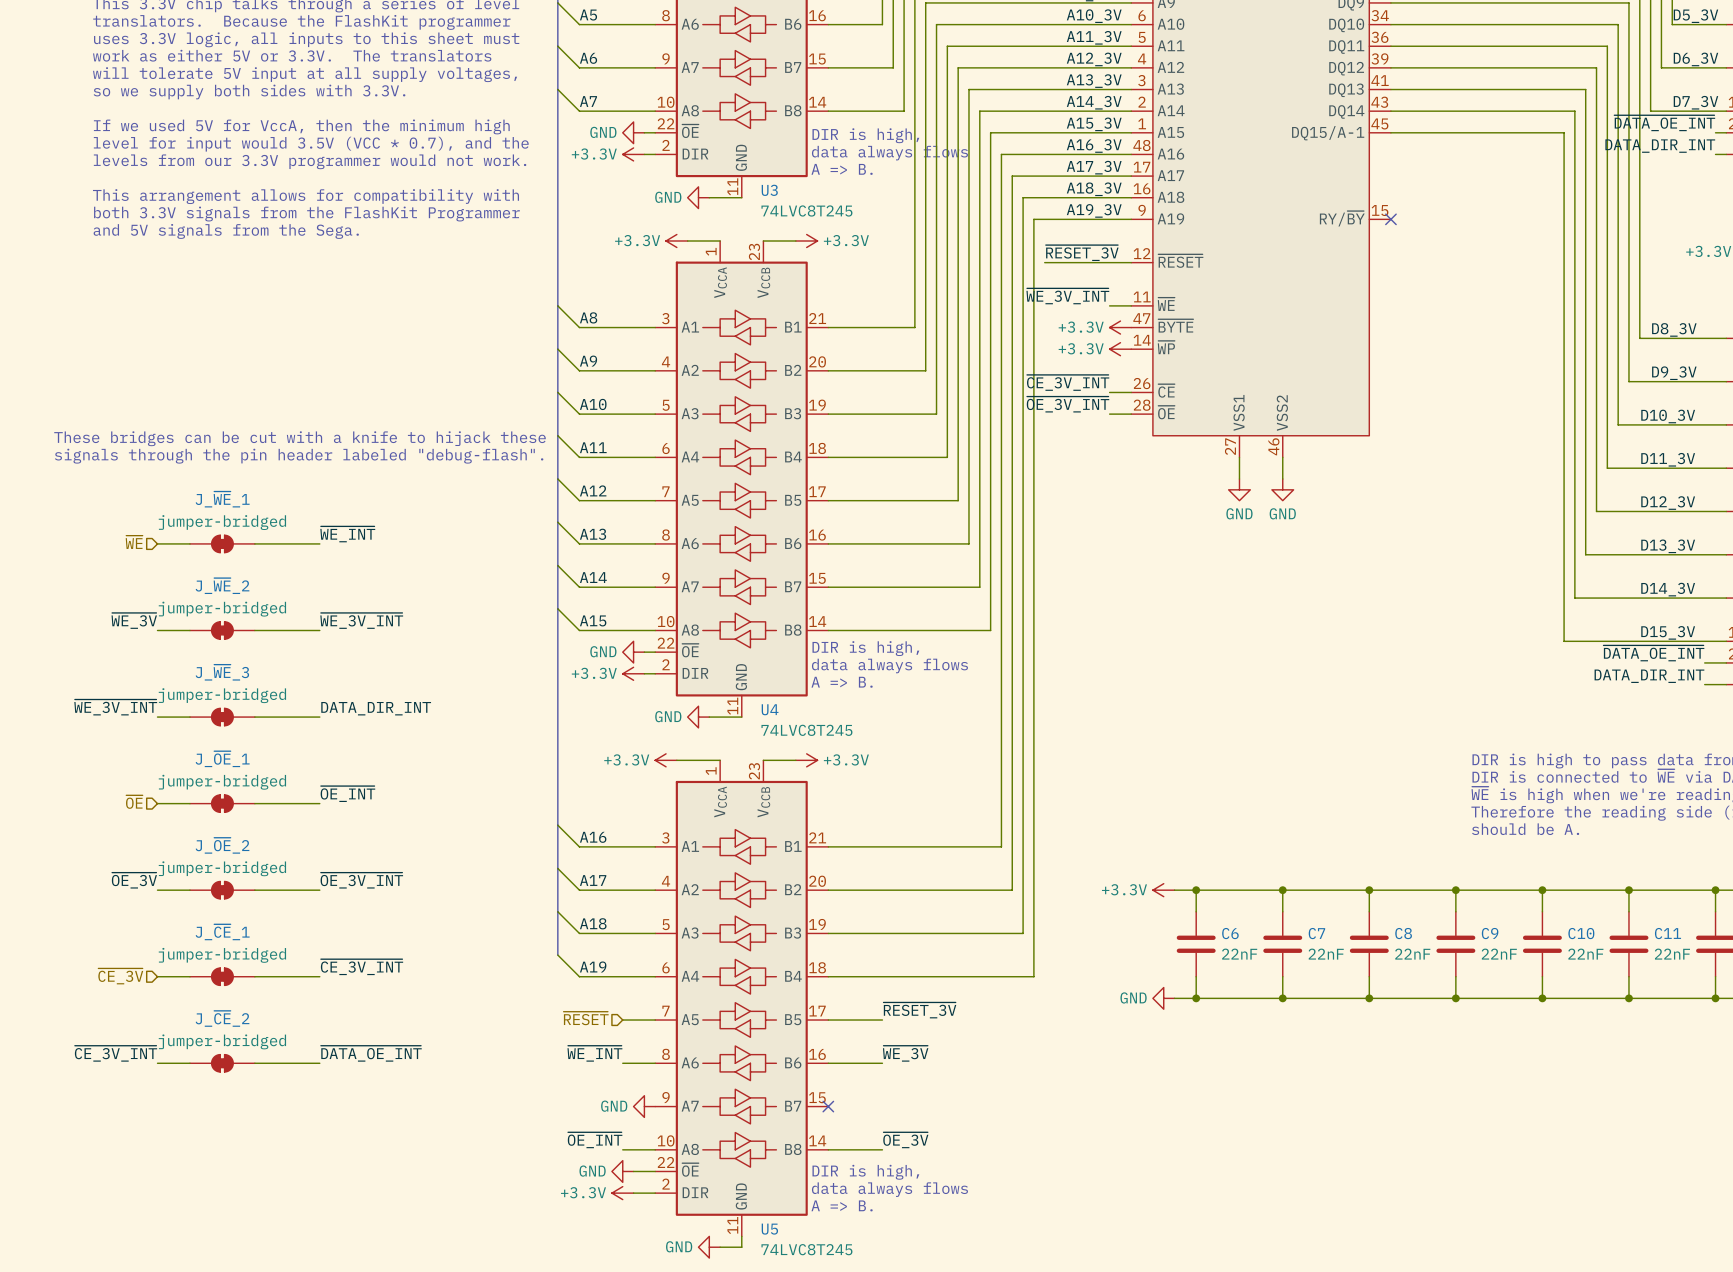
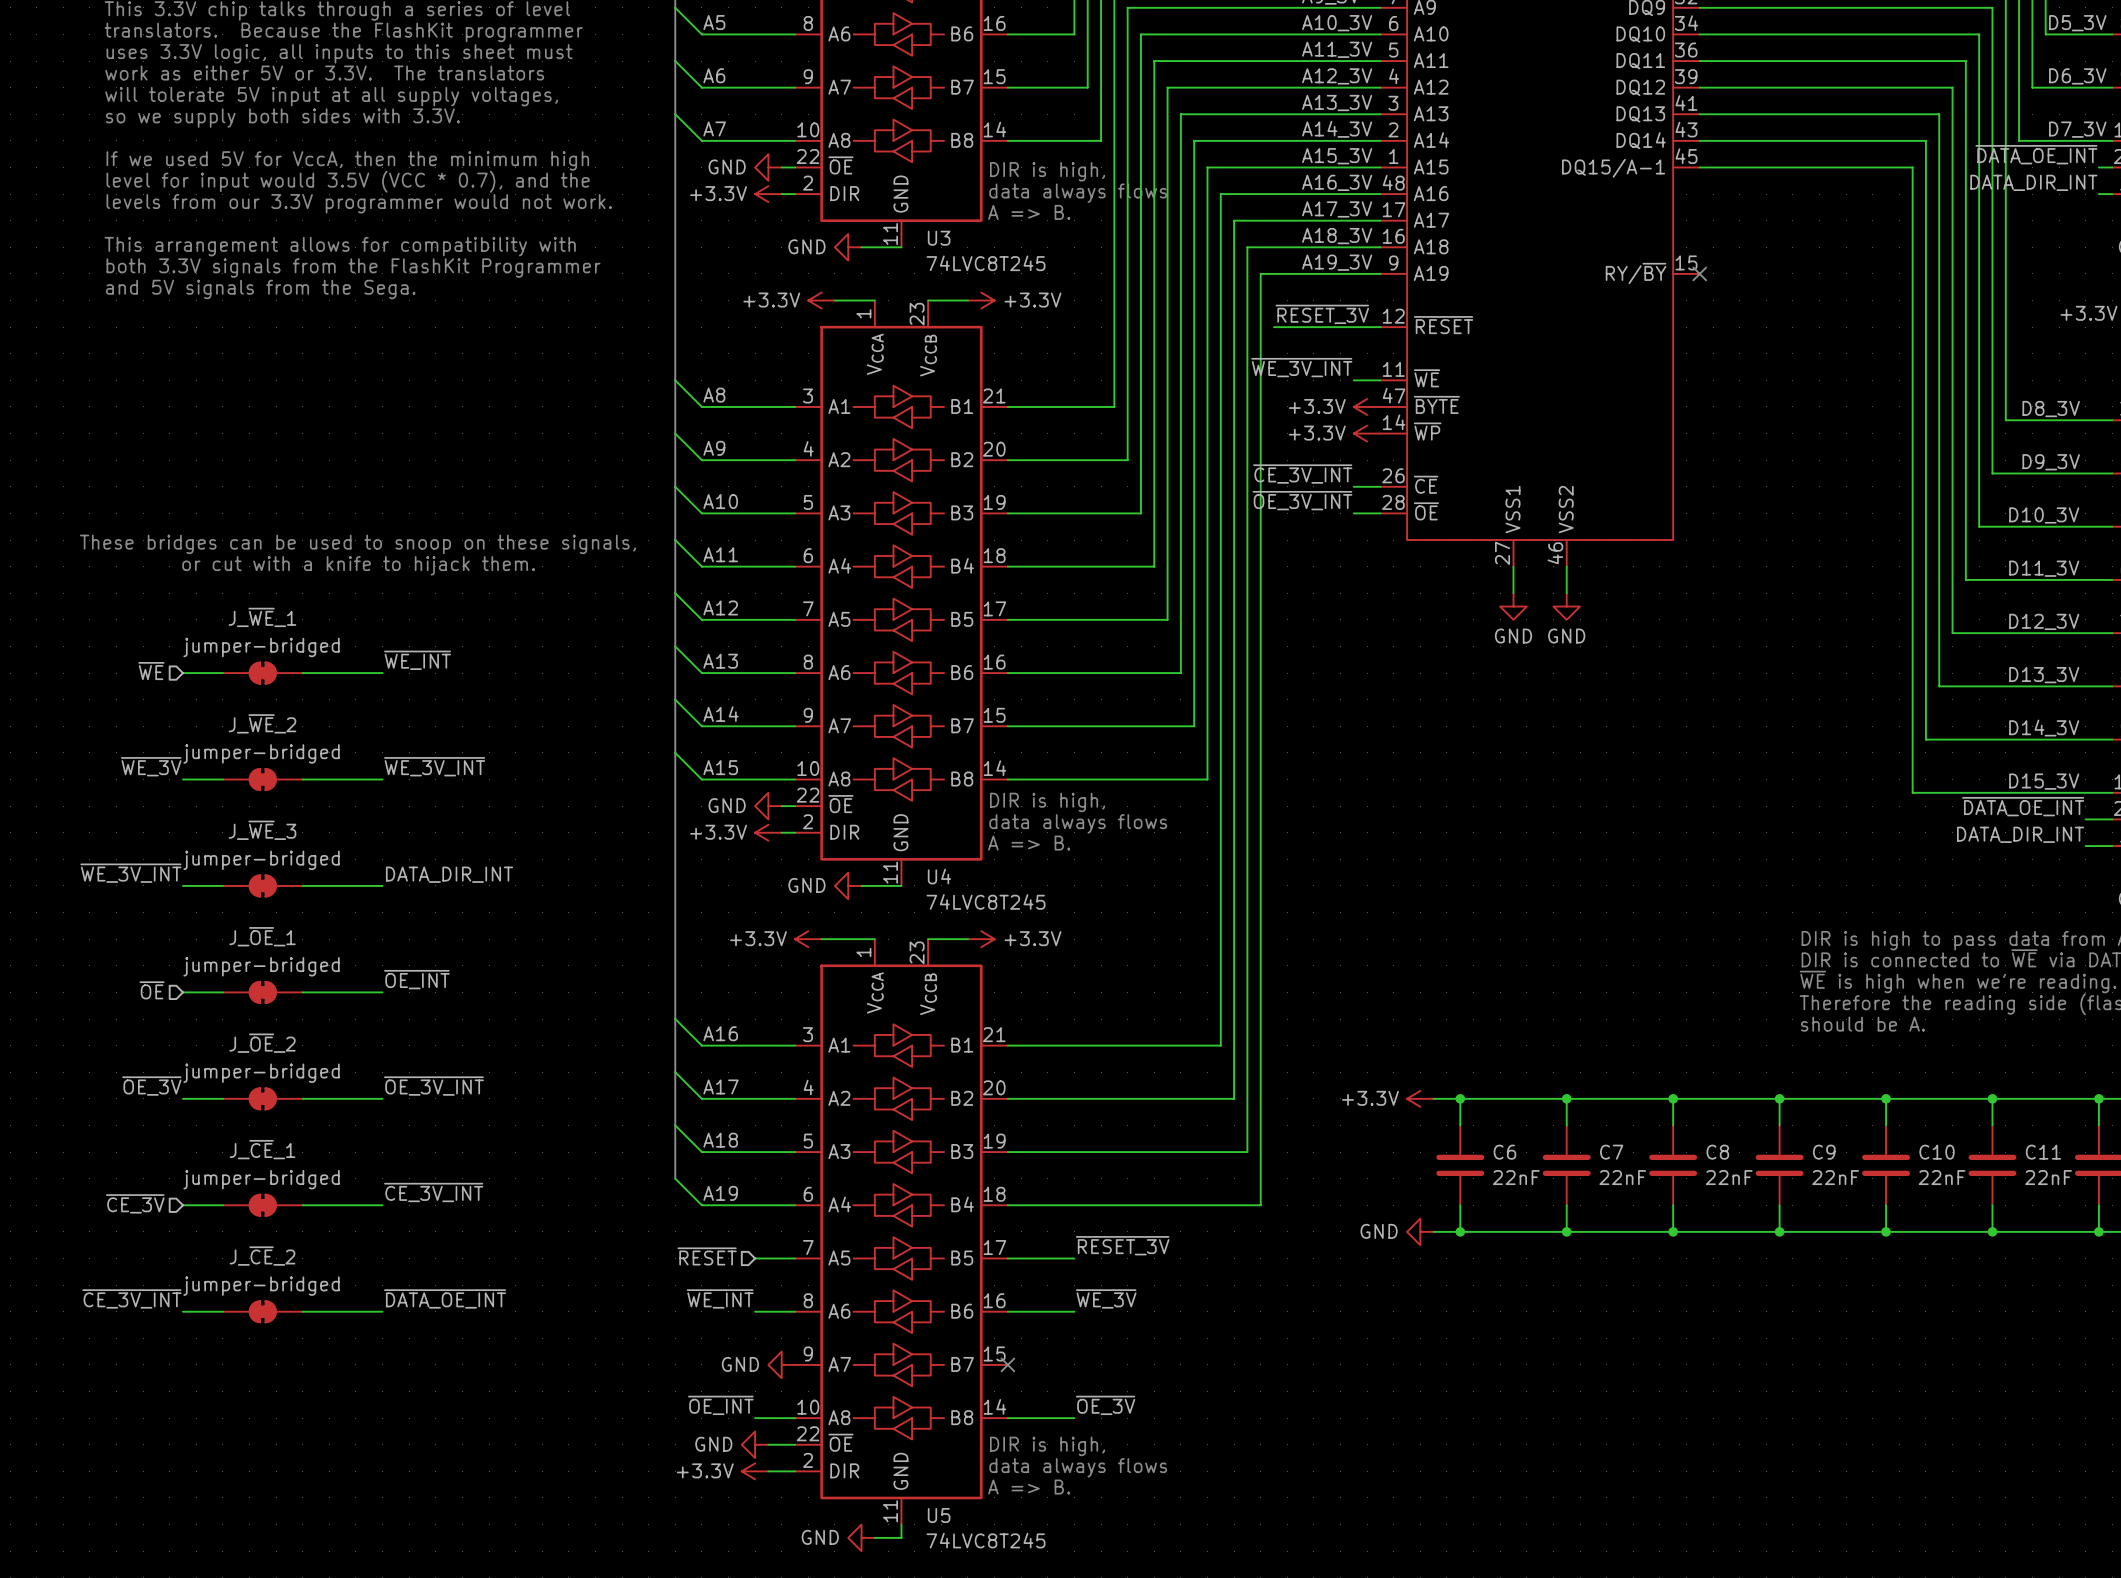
text: These bridges can be cut with a knife to hijack these (300, 438) -> These bridges can be used to snoop on these signals, (357, 544)
text: signals through the pin header labeled "debug-flash". (299, 456) -> or cut with a knife to hijack them. (358, 565)

